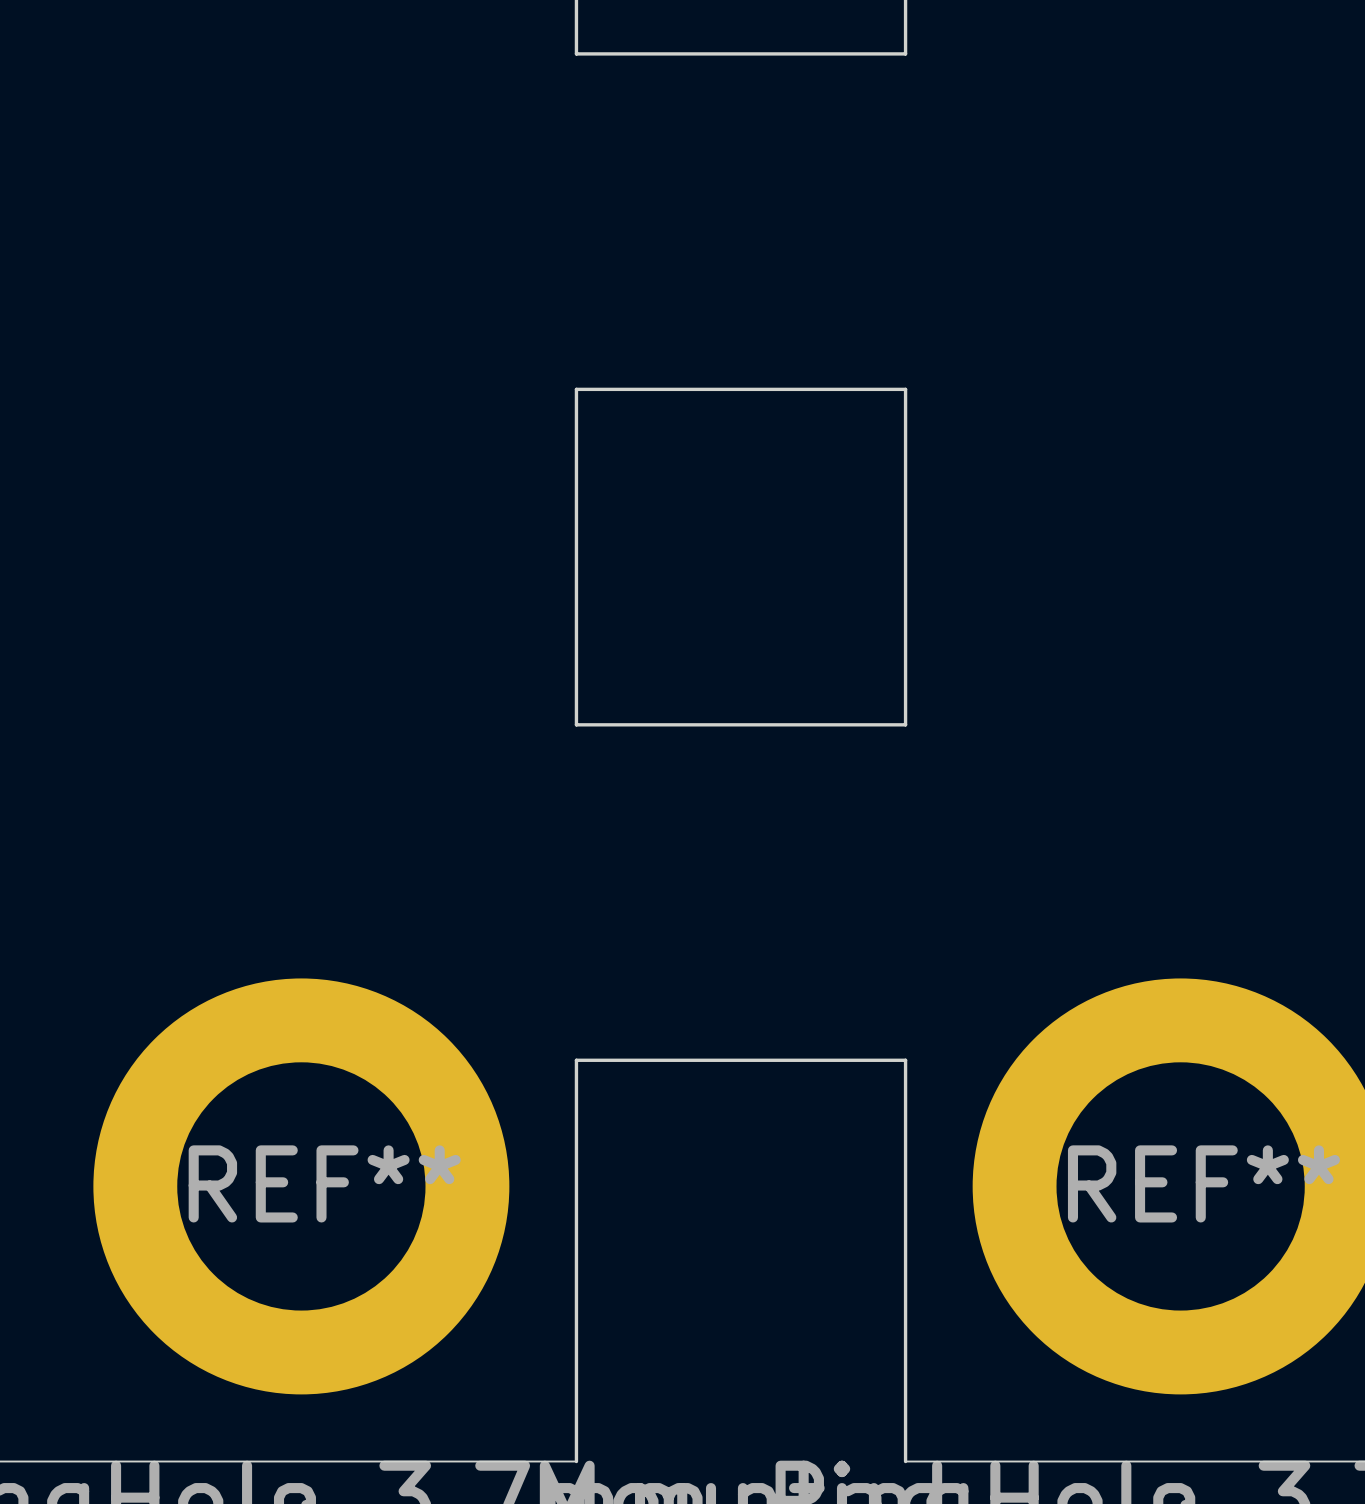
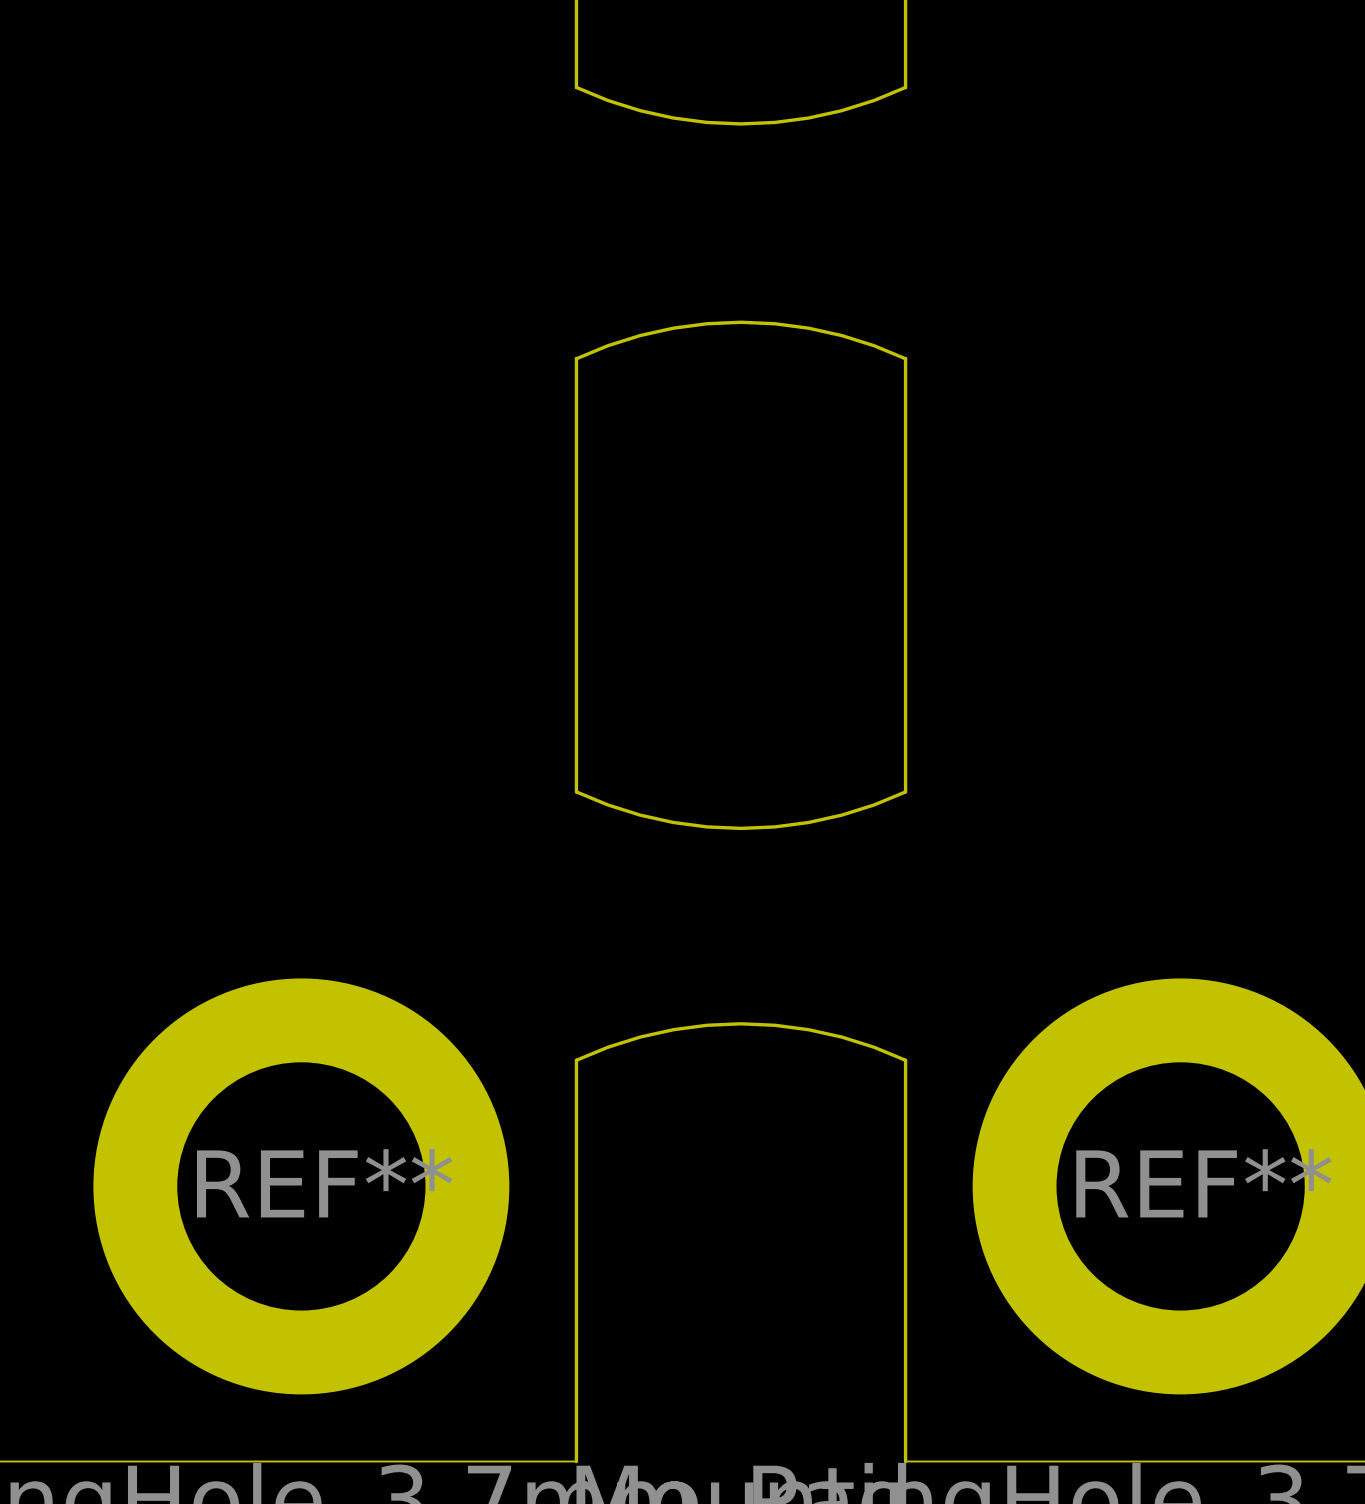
board edge: (576, 53) (905, 53) -> (576, 53) (576, 87) (640, 110) (673, 118) (741, 123) (808, 118) (874, 100) (905, 87) (905, 53)
board edge: (576, 389) (905, 389) -> (576, 389) (576, 358) (607, 345) (673, 328) (741, 322) (808, 328) (874, 345) (905, 358) (905, 389)
board edge: (576, 724) (905, 724) -> (576, 724) (576, 791) (640, 815) (673, 822) (741, 828) (808, 822) (841, 815) (905, 791) (905, 724)
board edge: (576, 1060) (905, 1060) -> (576, 1060) (607, 1047) (673, 1029) (741, 1023) (808, 1029) (841, 1037) (905, 1060)

